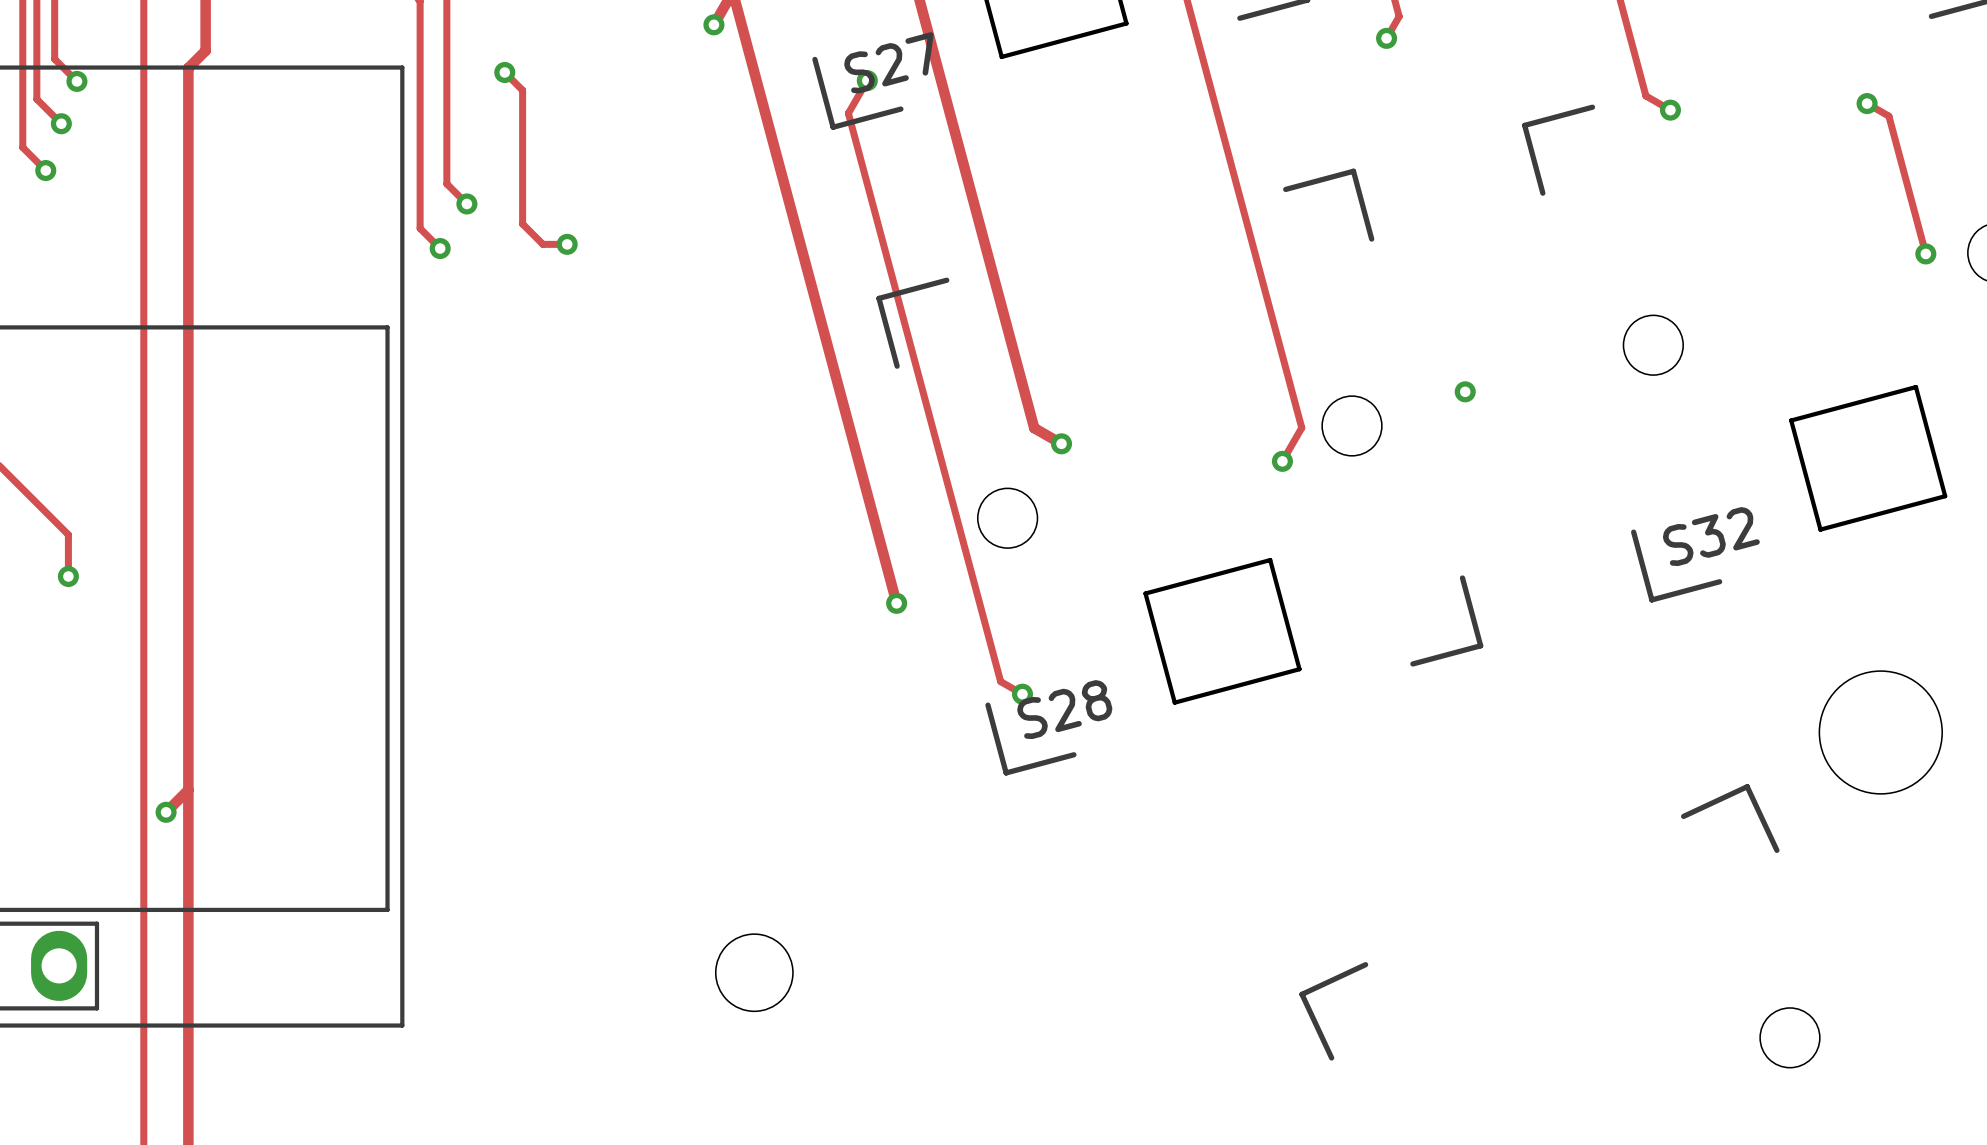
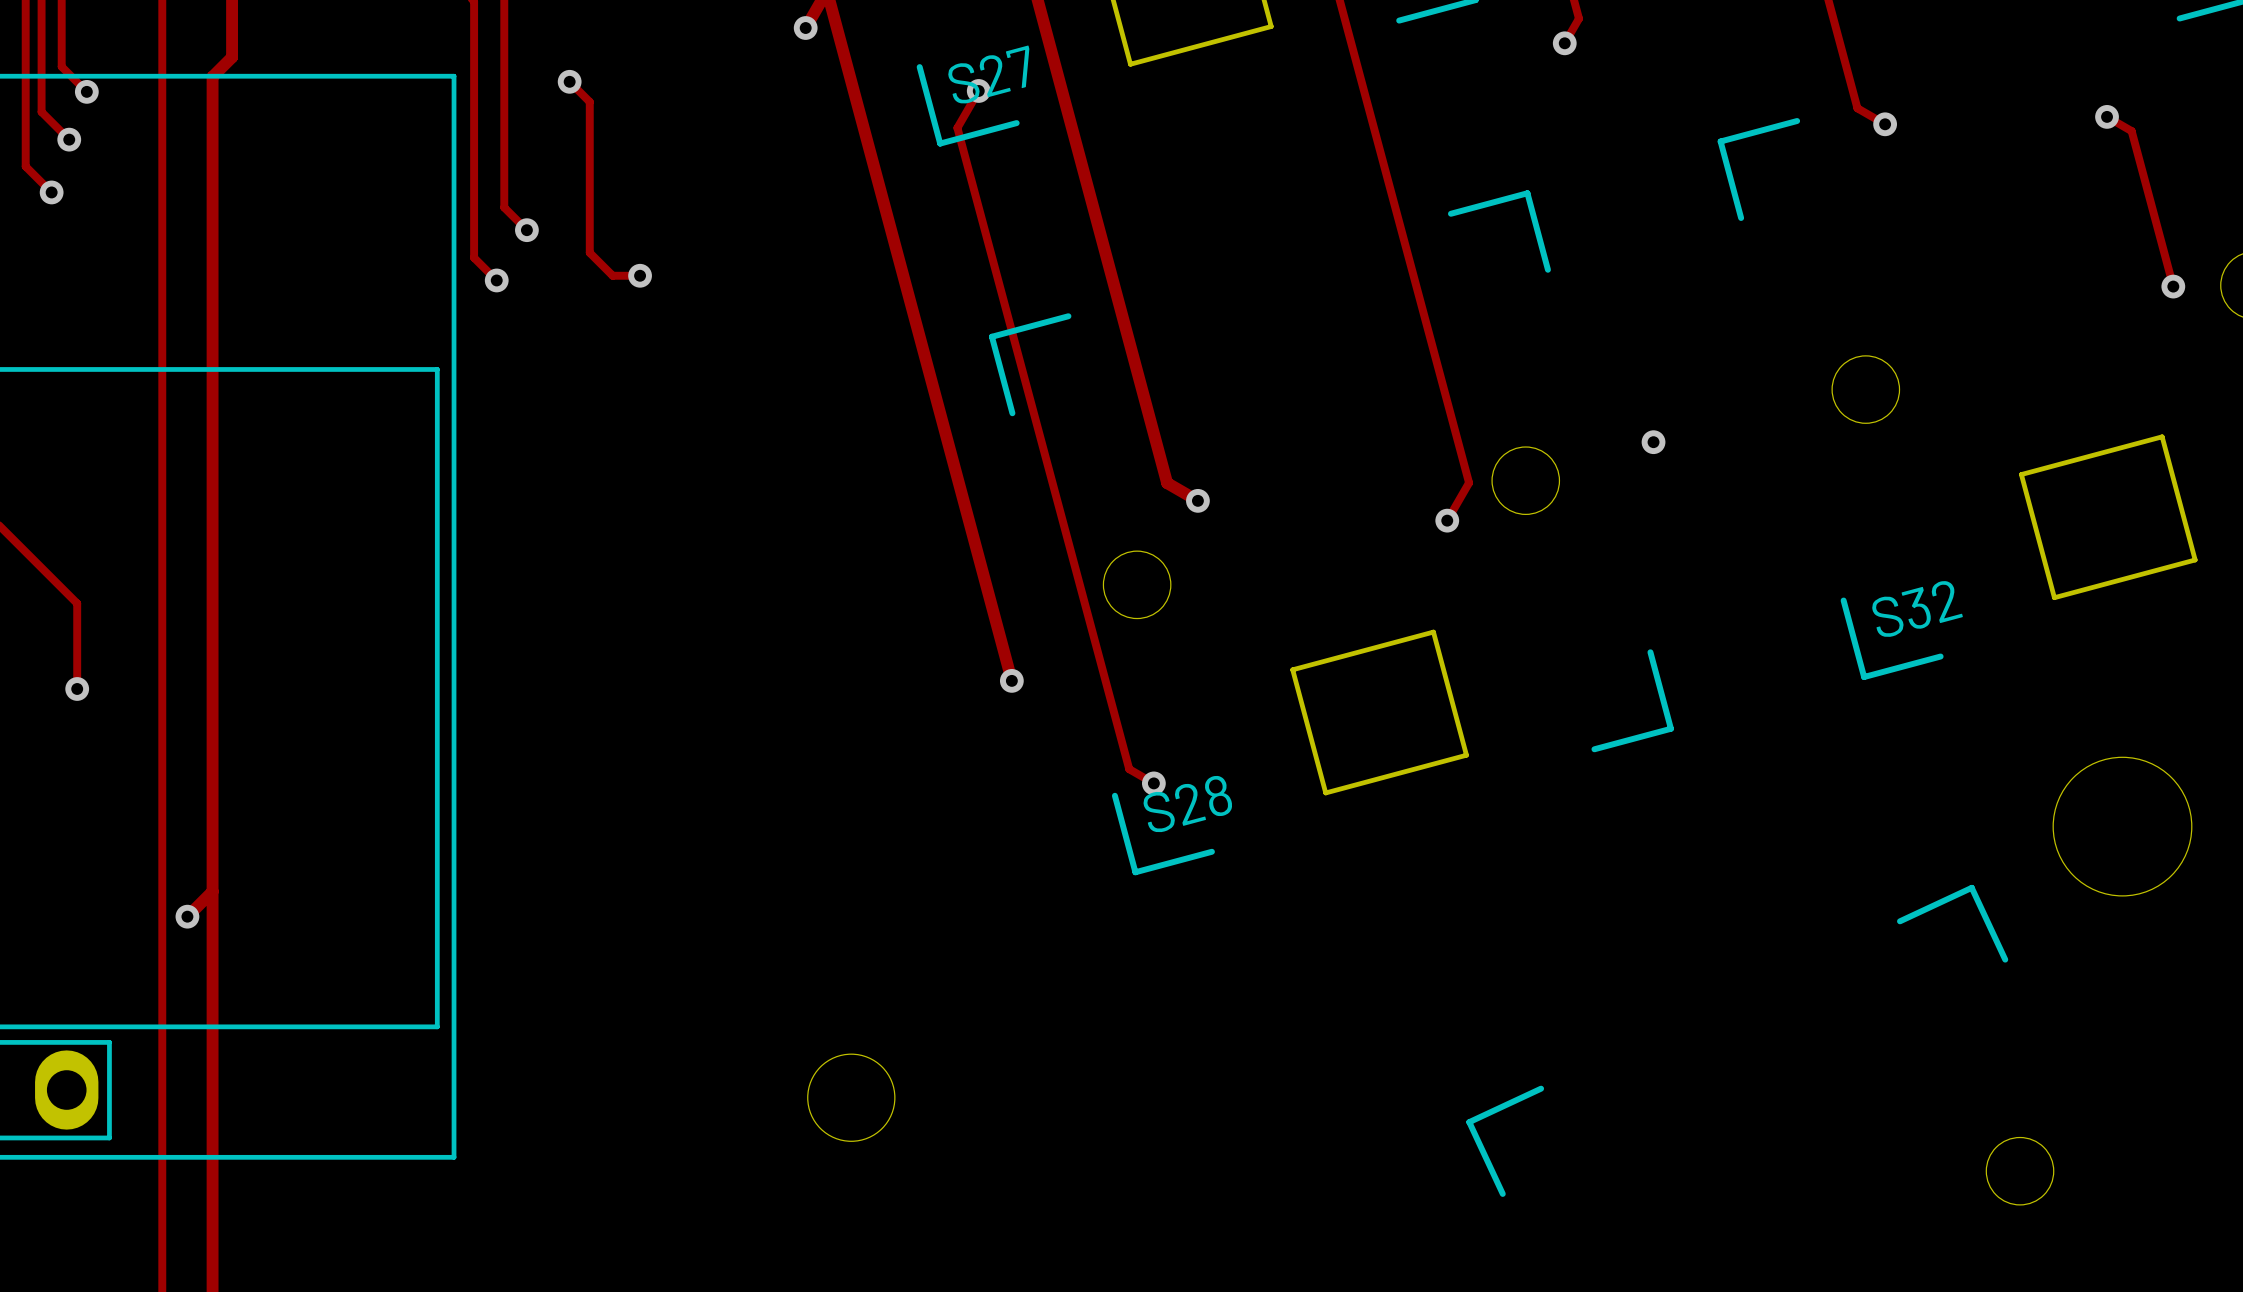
track: none -> (77, 650) (77, 688)
via position: (68, 576) -> (77, 688)

